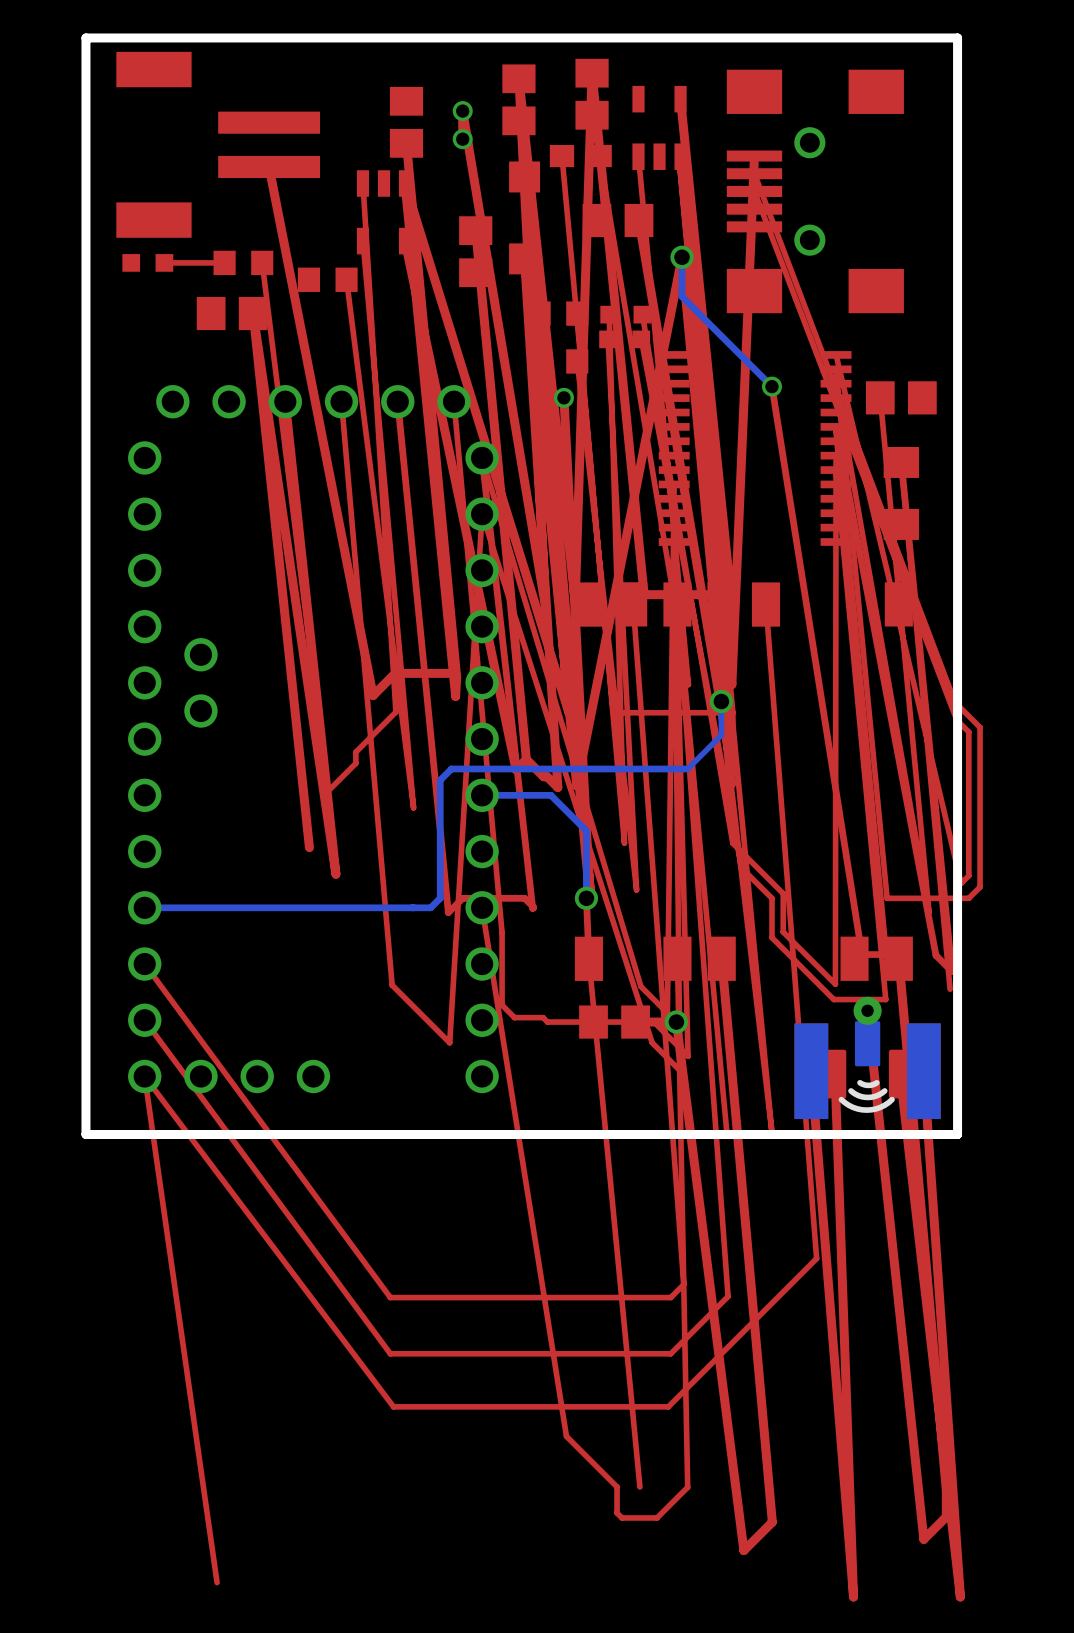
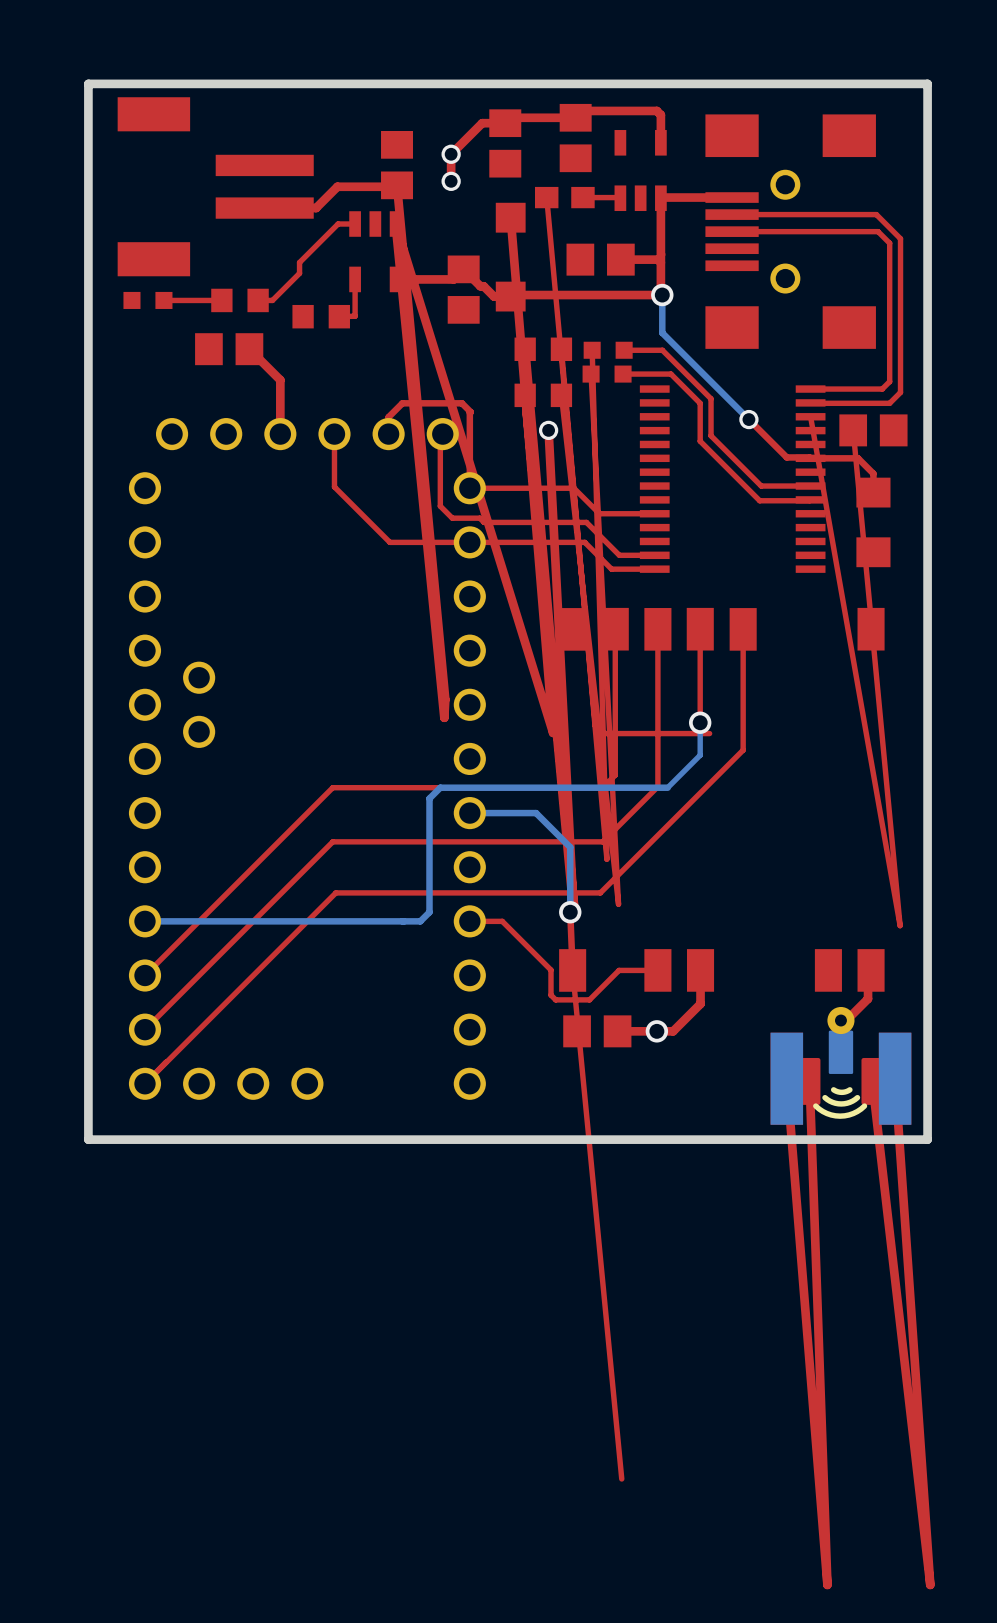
top track: (680, 99) (731, 598) (727, 594) (644, 594) (592, 73) (575, 601) (518, 78) (545, 607) (462, 111) -> (660, 142) (660, 114) (656, 110) (577, 110) (575, 117) (510, 117) (505, 123) (482, 123) (451, 154)
top track: (599, 156) (688, 684) (638, 156) -> (582, 197) (620, 198)
top track: (754, 156) (731, 684) (680, 156) (731, 712) (731, 784) (682, 257) (576, 785) (524, 258) (557, 787) (526, 759) -> (732, 197) (660, 198) (662, 295) (494, 296) (463, 269) (453, 279) (395, 279)
top track: (269, 166) (373, 695) (395, 673) (452, 673) (456, 677) -> (264, 208) (316, 208) (337, 186) (392, 186) (396, 190)
top track: (754, 173) (954, 702) (980, 727) (980, 887) (968, 898) (887, 898) (836, 369) -> (732, 214) (876, 214) (900, 238) (900, 392) (889, 403) (810, 402)
top track: (362, 183) (395, 712) (355, 752) (355, 763) (327, 791) (262, 262) -> (355, 224) (338, 224) (299, 262) (299, 273) (272, 300) (258, 300)
top track: (754, 191) (956, 720) (968, 732) (968, 875) (961, 883) (836, 354) -> (732, 231) (878, 231) (889, 243) (889, 381) (882, 389) (810, 389)
top track: (639, 220) (728, 749) (731, 752) -> (620, 259) (657, 259) (660, 262)
top track: (475, 230) (526, 759) -> none
top track: (362, 241) (413, 807) (346, 279) -> (355, 279) (355, 316) (339, 316)
top track: (405, 241) (516, 769) (526, 759) -> none
top track: (642, 314) (732, 843) (783, 893) (783, 932) (835, 984) (836, 455) -> (624, 350) (662, 350) (711, 398) (711, 435) (761, 486) (810, 486)
top track: (641, 339) (741, 867) (771, 898) (771, 937) (833, 999) (885, 999) (836, 470) -> (623, 374) (670, 374) (700, 403) (700, 441) (759, 500) (810, 499)
top track: (771, 386) (861, 954) (885, 954) (836, 426) (935, 955) (951, 971) (901, 462) (950, 989) -> (748, 419) (786, 457) (858, 458) (873, 473) (873, 492) (871, 490)
top track: (285, 401) (335, 874) (253, 313) (309, 847) -> (280, 434) (280, 380) (249, 349)
top track: (341, 401) (392, 985) (449, 1042) (482, 514) (652, 1042) (679, 1070) (674, 542) -> (334, 434) (334, 486) (389, 542) (584, 542) (611, 569) (654, 569)
top track: (397, 401) (448, 912) (462, 898) (524, 898) (533, 907) (482, 457) (640, 986) (667, 1013) (674, 484) -> (388, 434) (388, 417) (402, 403) (461, 403) (470, 412) (469, 488) (573, 488) (599, 513) (654, 513)
top track: (454, 401) (502, 932) (502, 1005) (514, 1017) (543, 1017) (547, 1022) (653, 1022) (688, 1056) (674, 527) -> (442, 434) (440, 436) (440, 506) (452, 518) (479, 518) (484, 522) (586, 522) (619, 555) (654, 555)
top track: (633, 604) (683, 1284) (670, 1297) (390, 1297) (144, 964) -> (615, 629) (615, 775) (602, 787) (332, 787) (144, 975)
top track: (721, 604) (771, 1133) (721, 701) -> (700, 629) (700, 722)
top track: (766, 604) (816, 1258) (668, 1406) (393, 1406) (144, 1076) (217, 1582) -> (743, 629) (743, 750) (600, 892) (335, 892) (144, 1083) (165, 1062)
top track: (482, 907) (566, 1436) (617, 1486) (617, 1513) (621, 1517) (657, 1517) (687, 1487) (677, 958) -> (469, 921) (502, 921) (550, 970) (550, 995) (555, 999) (589, 999) (619, 970) (657, 970)
top track: (721, 958) (772, 1522) (743, 1550) (676, 1022) -> (700, 970) (700, 1003) (673, 1031) (656, 1031)
top track: (898, 958) (946, 1490) (946, 1516) (923, 1539) (867, 1010) -> (871, 970) (868, 973) (868, 998) (846, 1020) (840, 1020)
top track: (144, 1020) (390, 1353) (670, 1353) (728, 1296) (677, 604) (727, 1134) -> (144, 1029) (332, 841) (602, 841) (657, 786) (656, 630)

